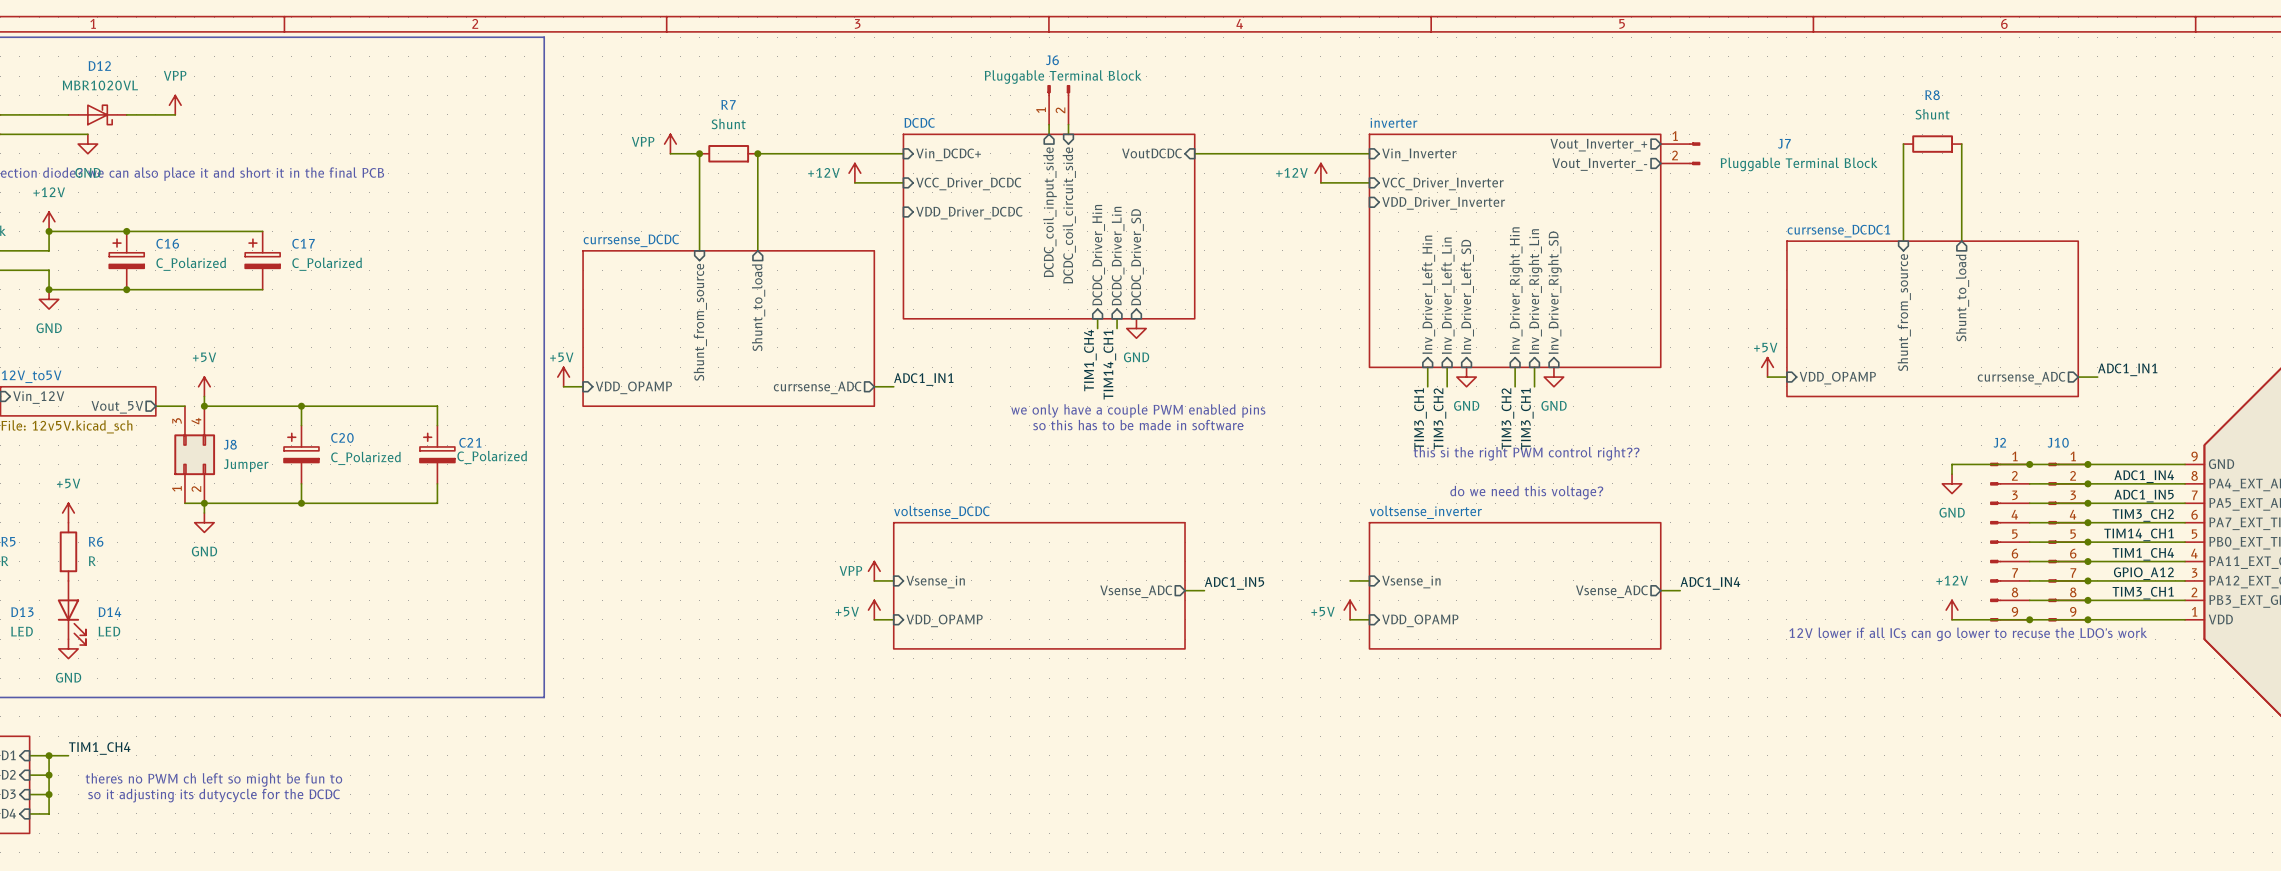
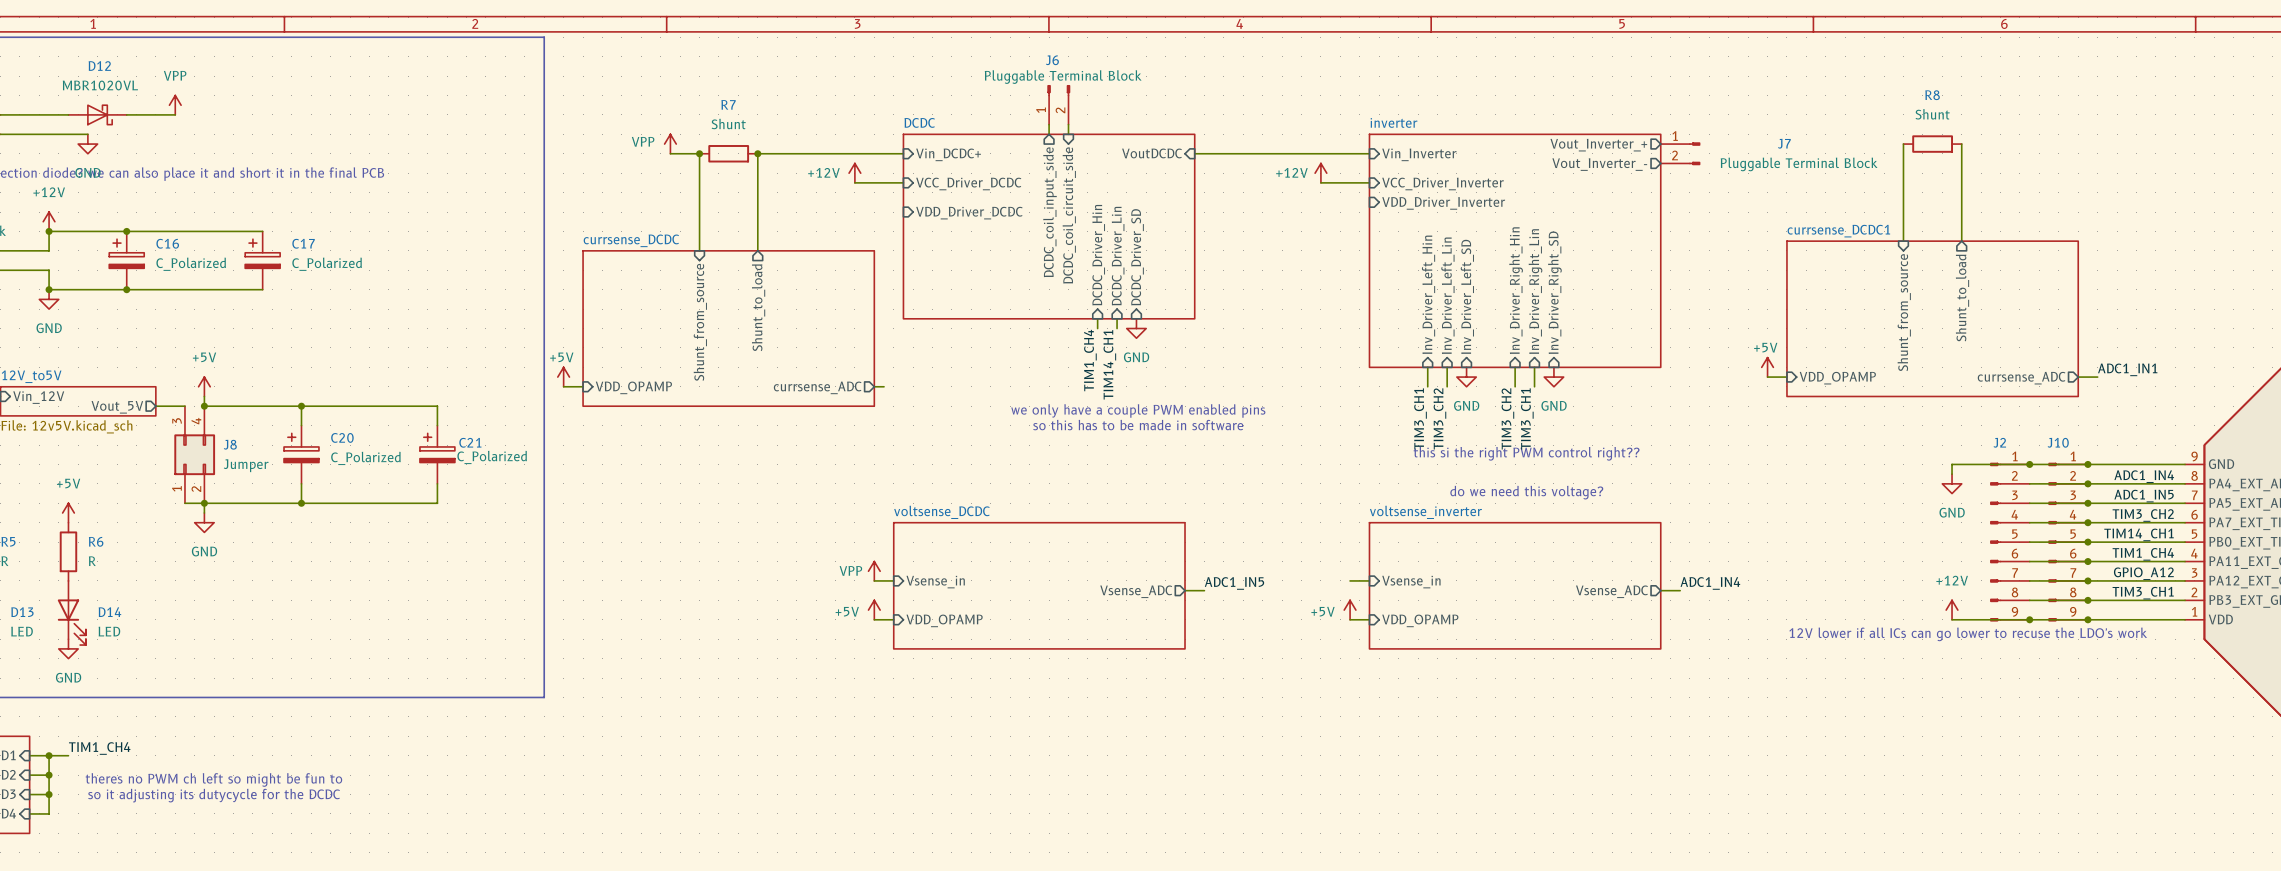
label: ADC1_IN1 (923, 379) -> none
wire: (884, 386) (893, 386) -> none

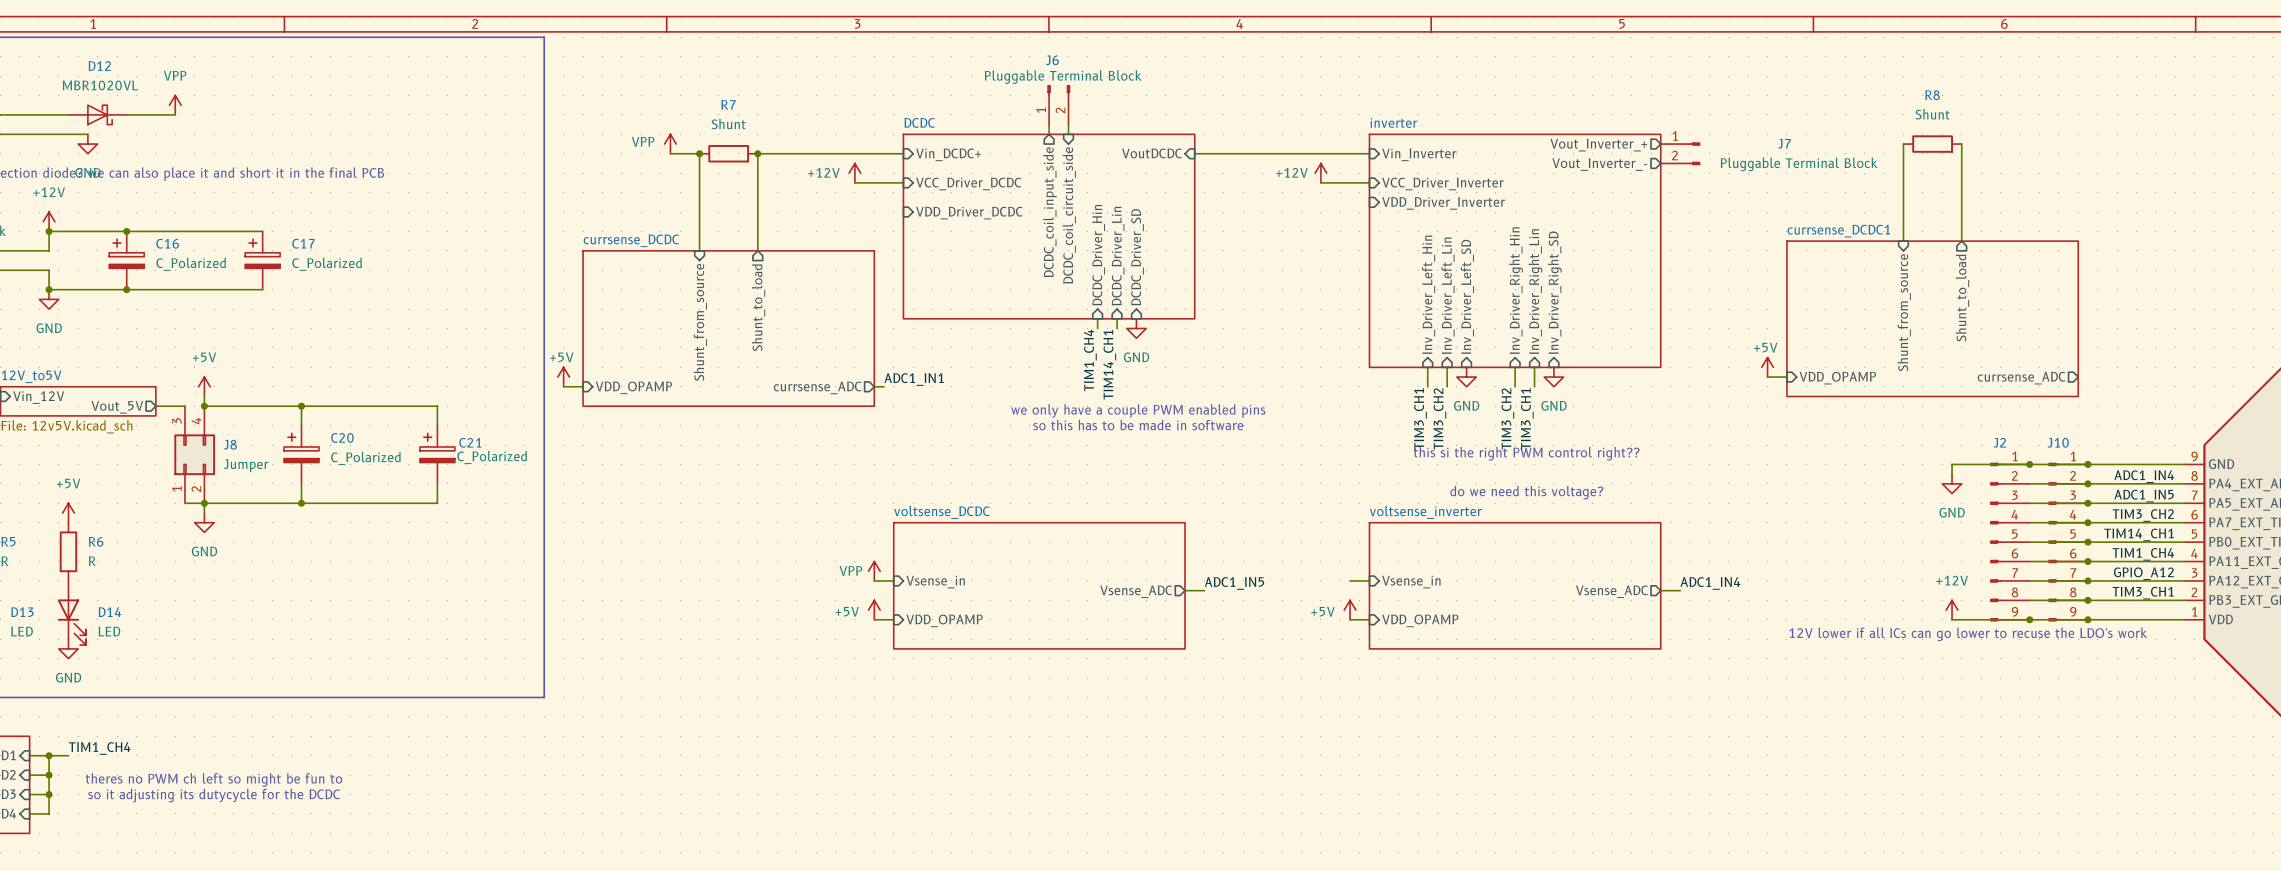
label: ADC1_IN1 (2127, 369) -> none
wire: (2078, 377) (2097, 377) -> none
label: none -> ADC1_IN1 (914, 379)

